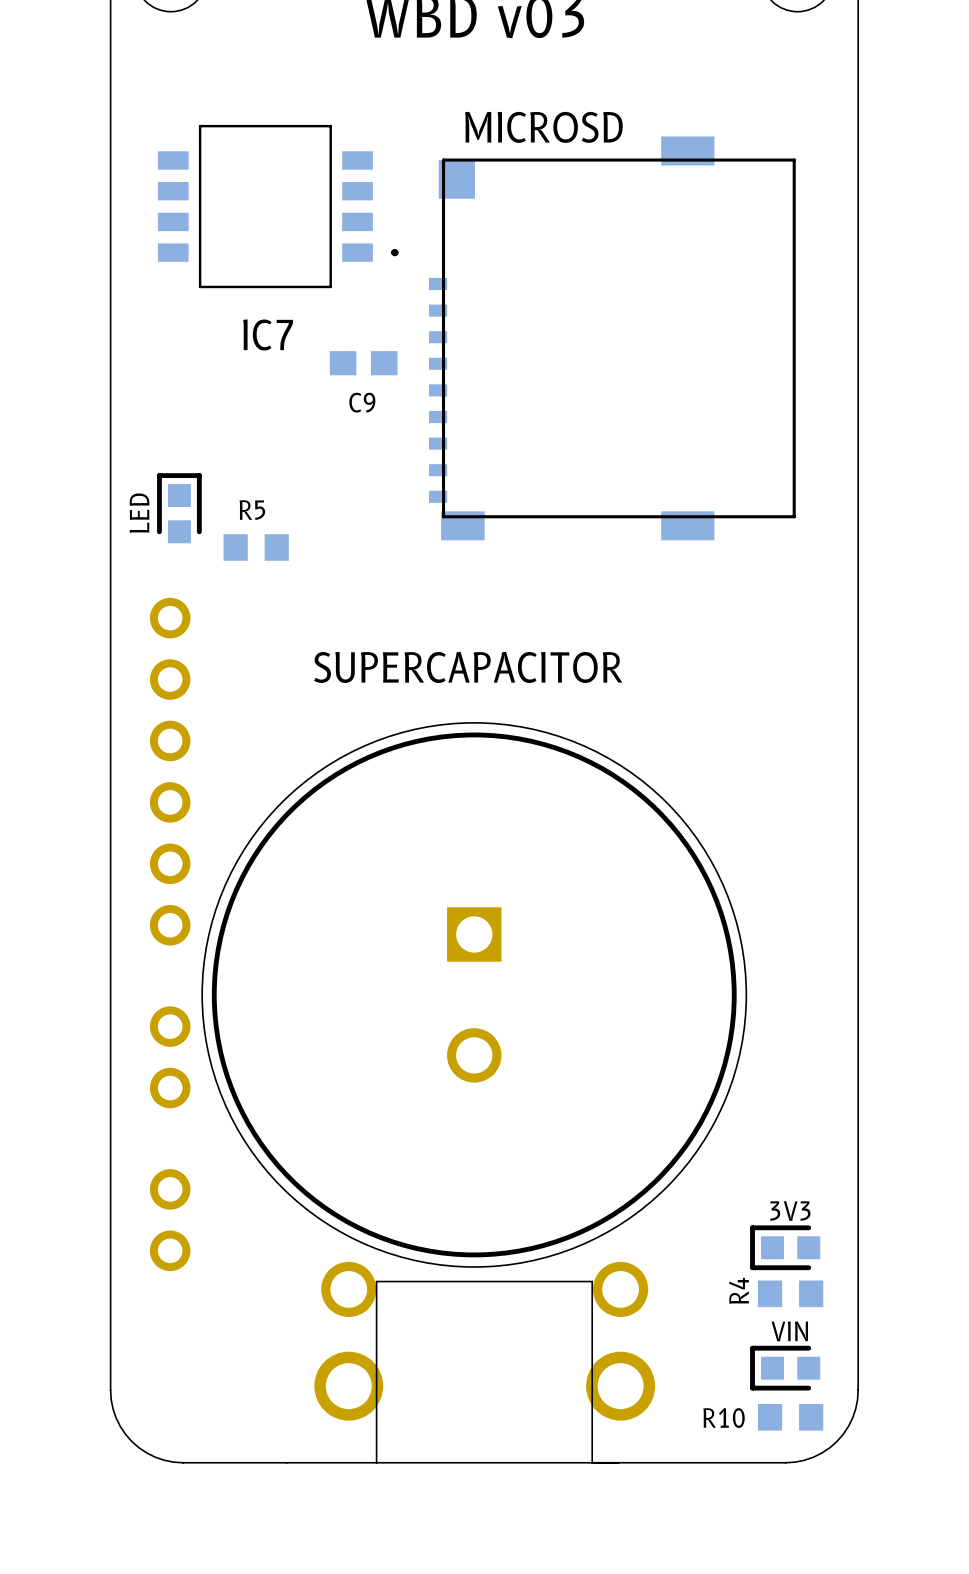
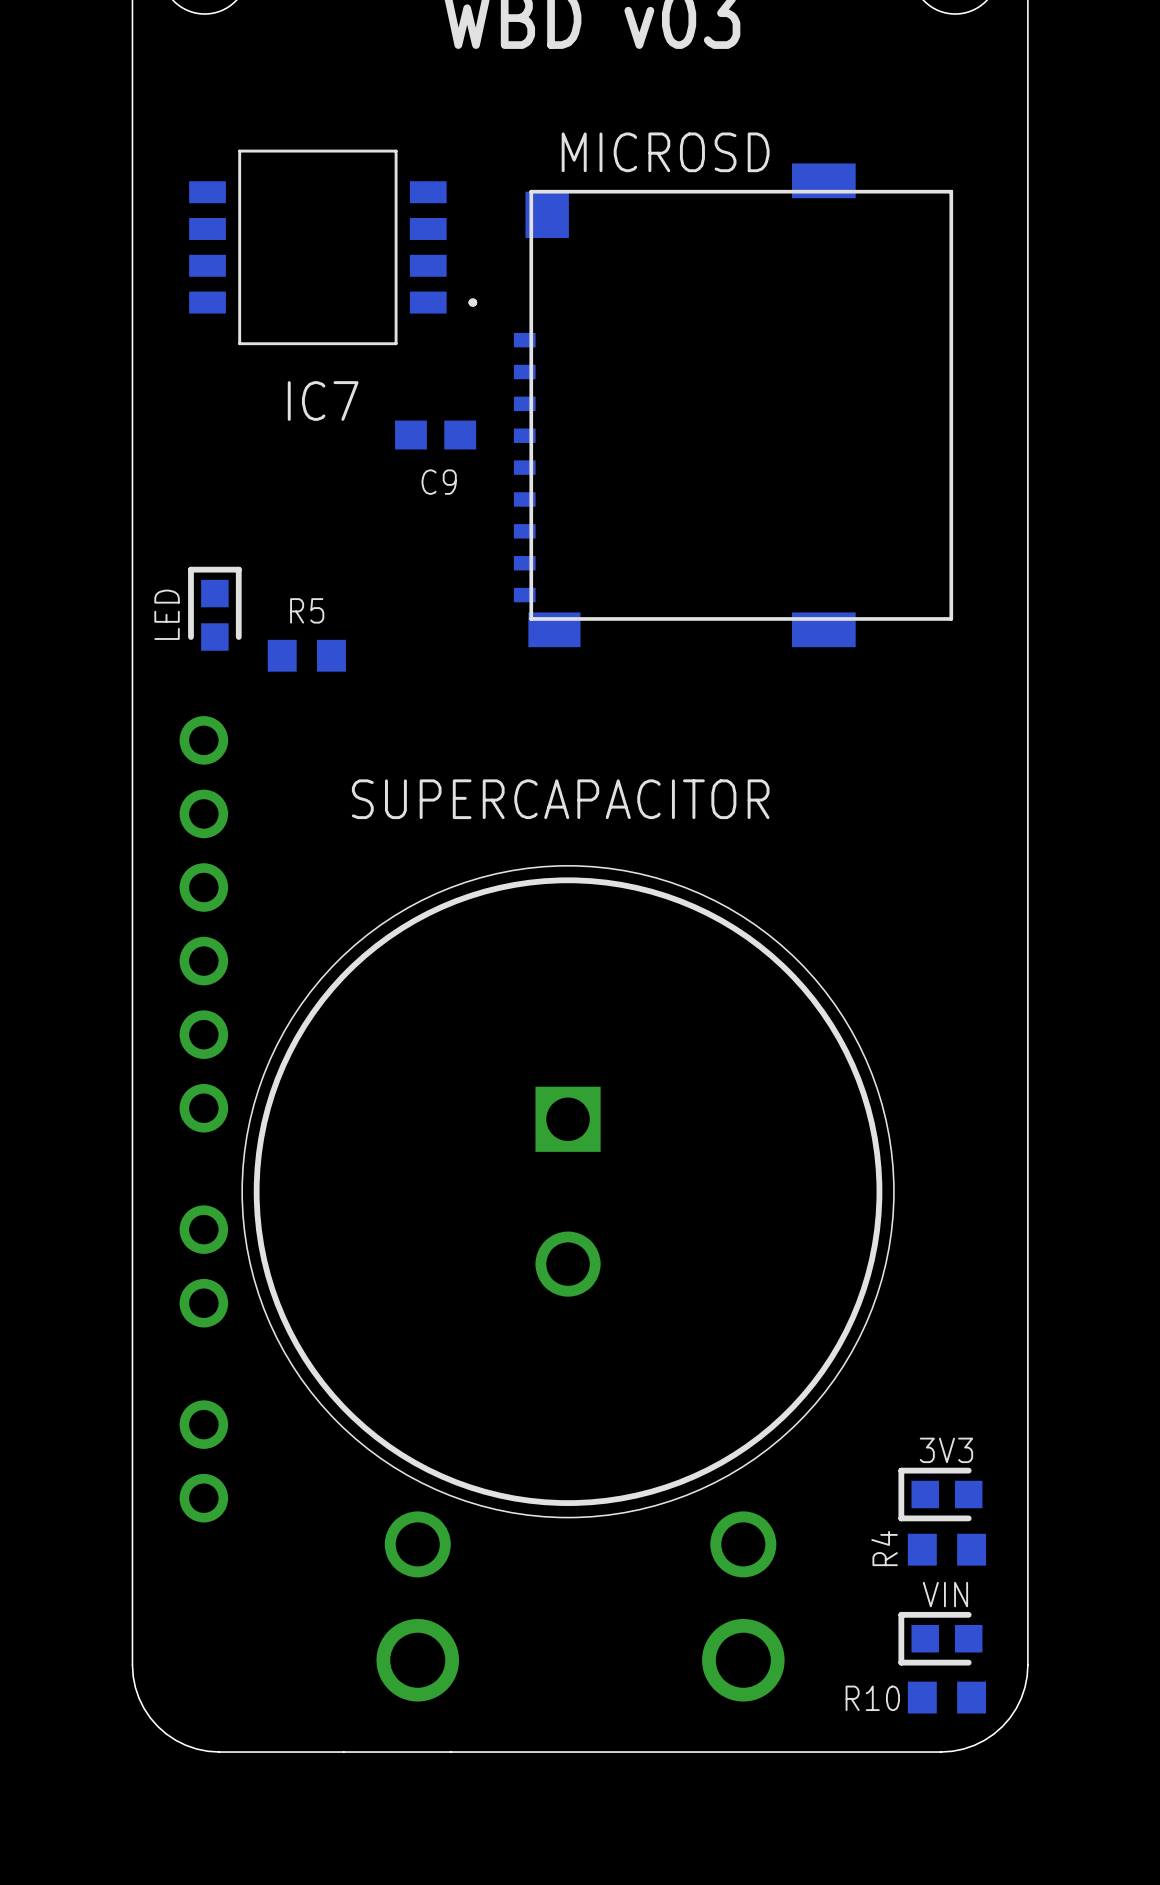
board edge: (618, 1462) (592, 1462) (592, 1281) (376, 1281) (376, 1462) -> none

